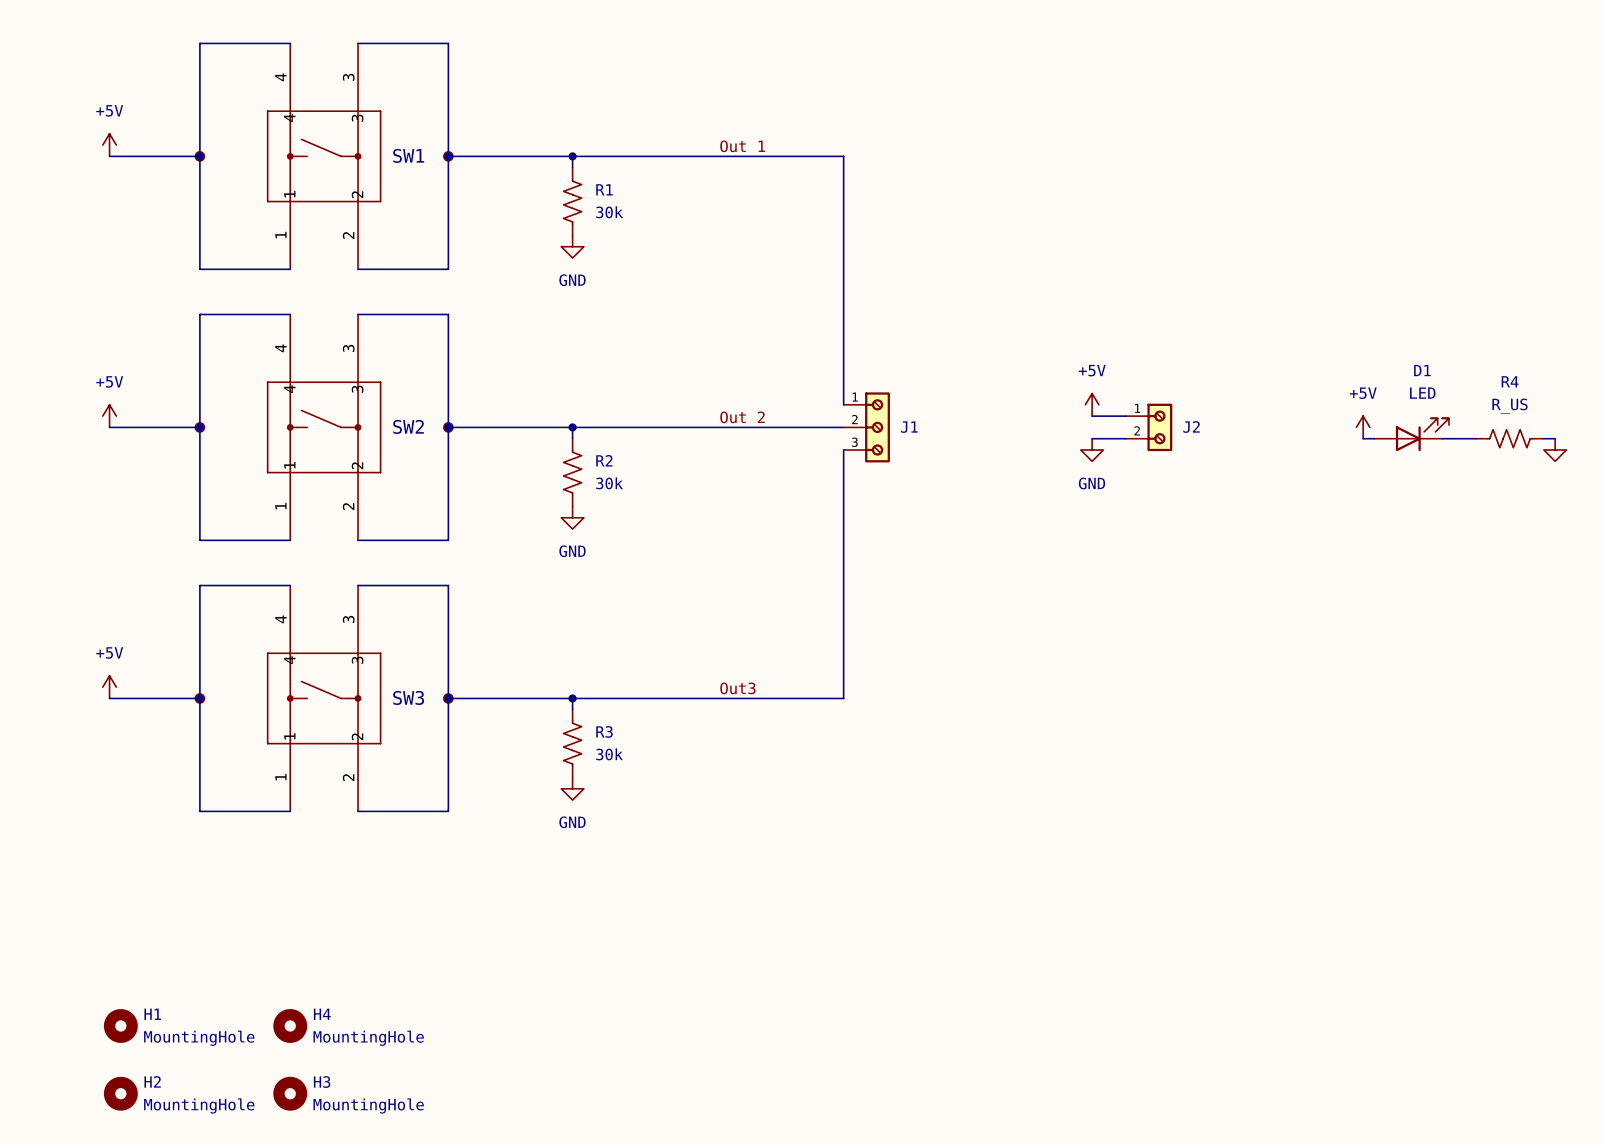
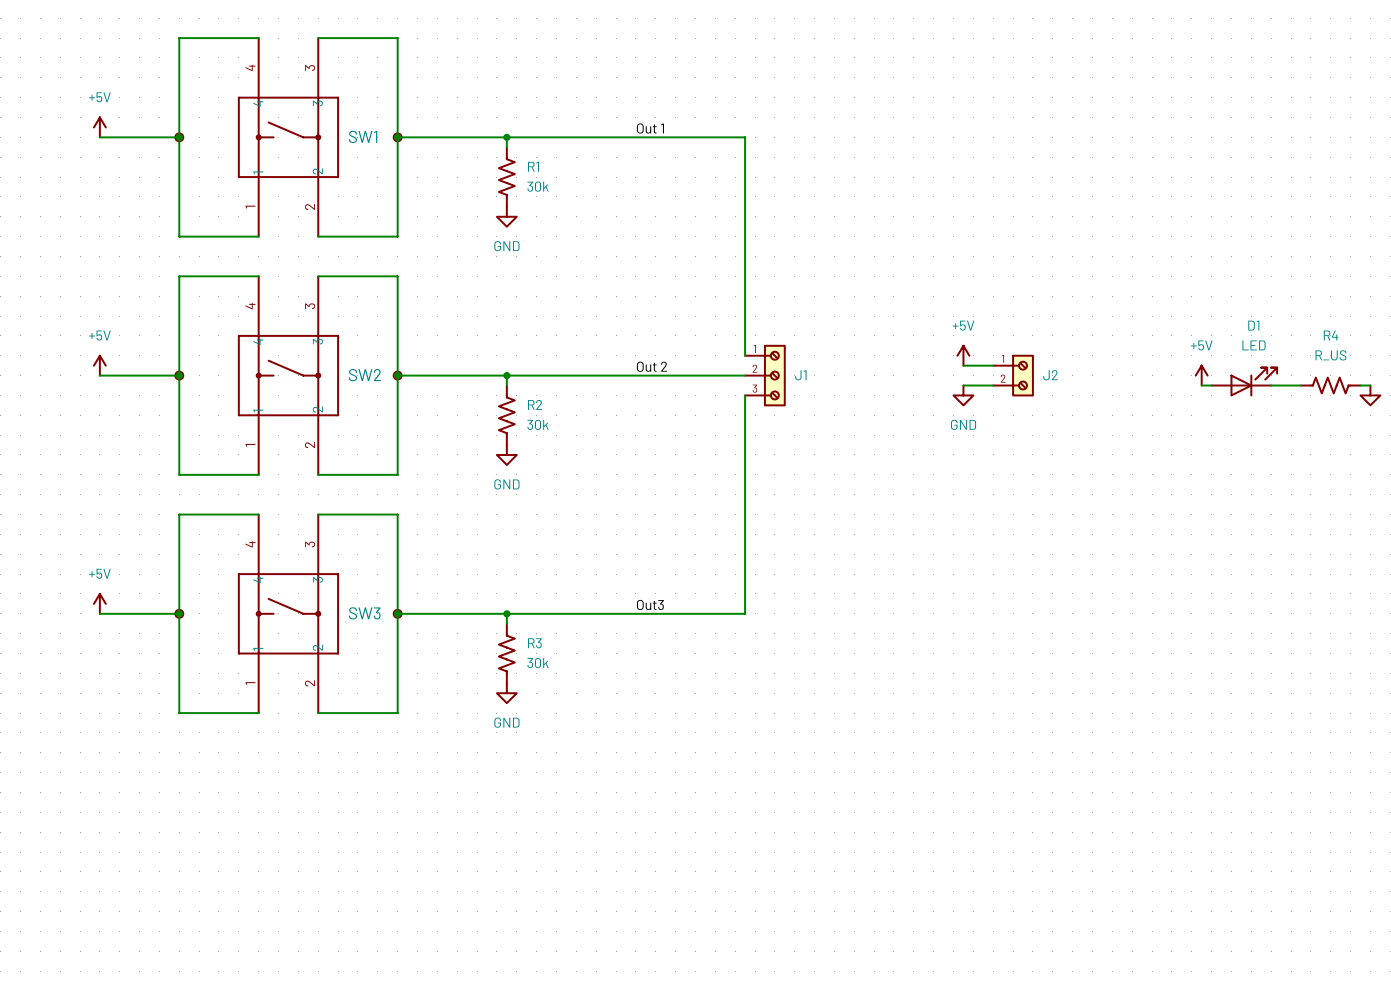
H1: MountingHole (120, 1025) -> none
H4: MountingHole (290, 1025) -> none
H2: MountingHole (120, 1093) -> none
H3: MountingHole (290, 1093) -> none

